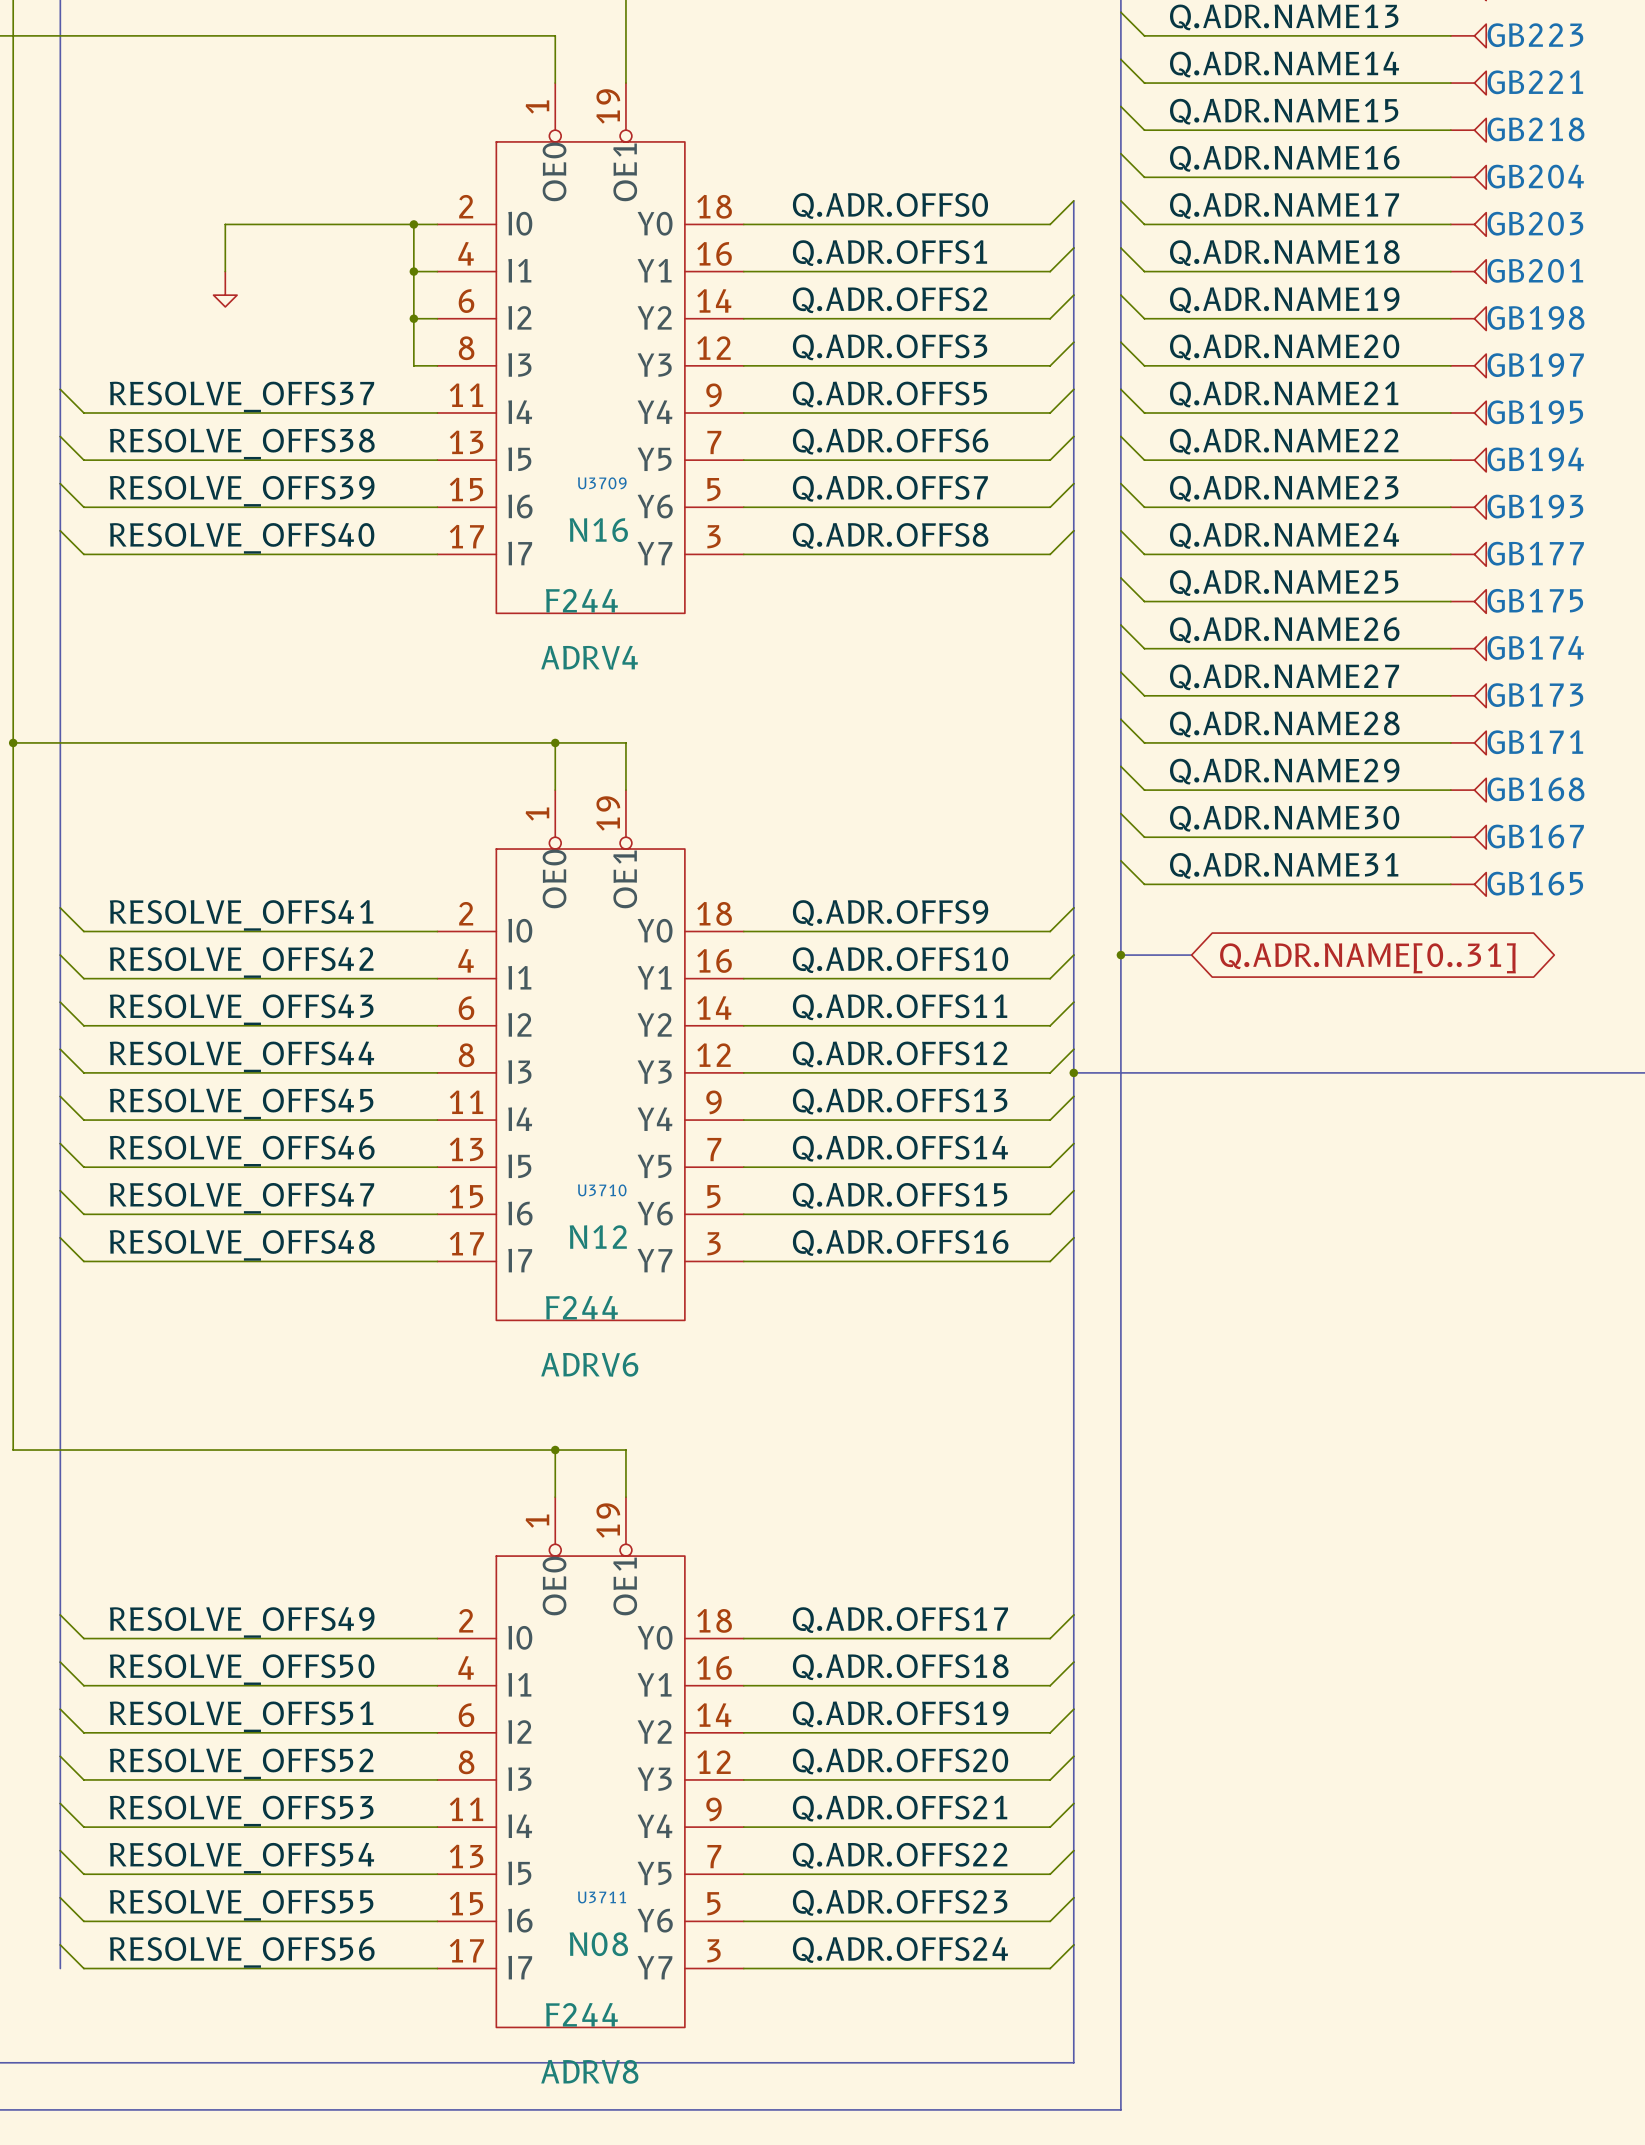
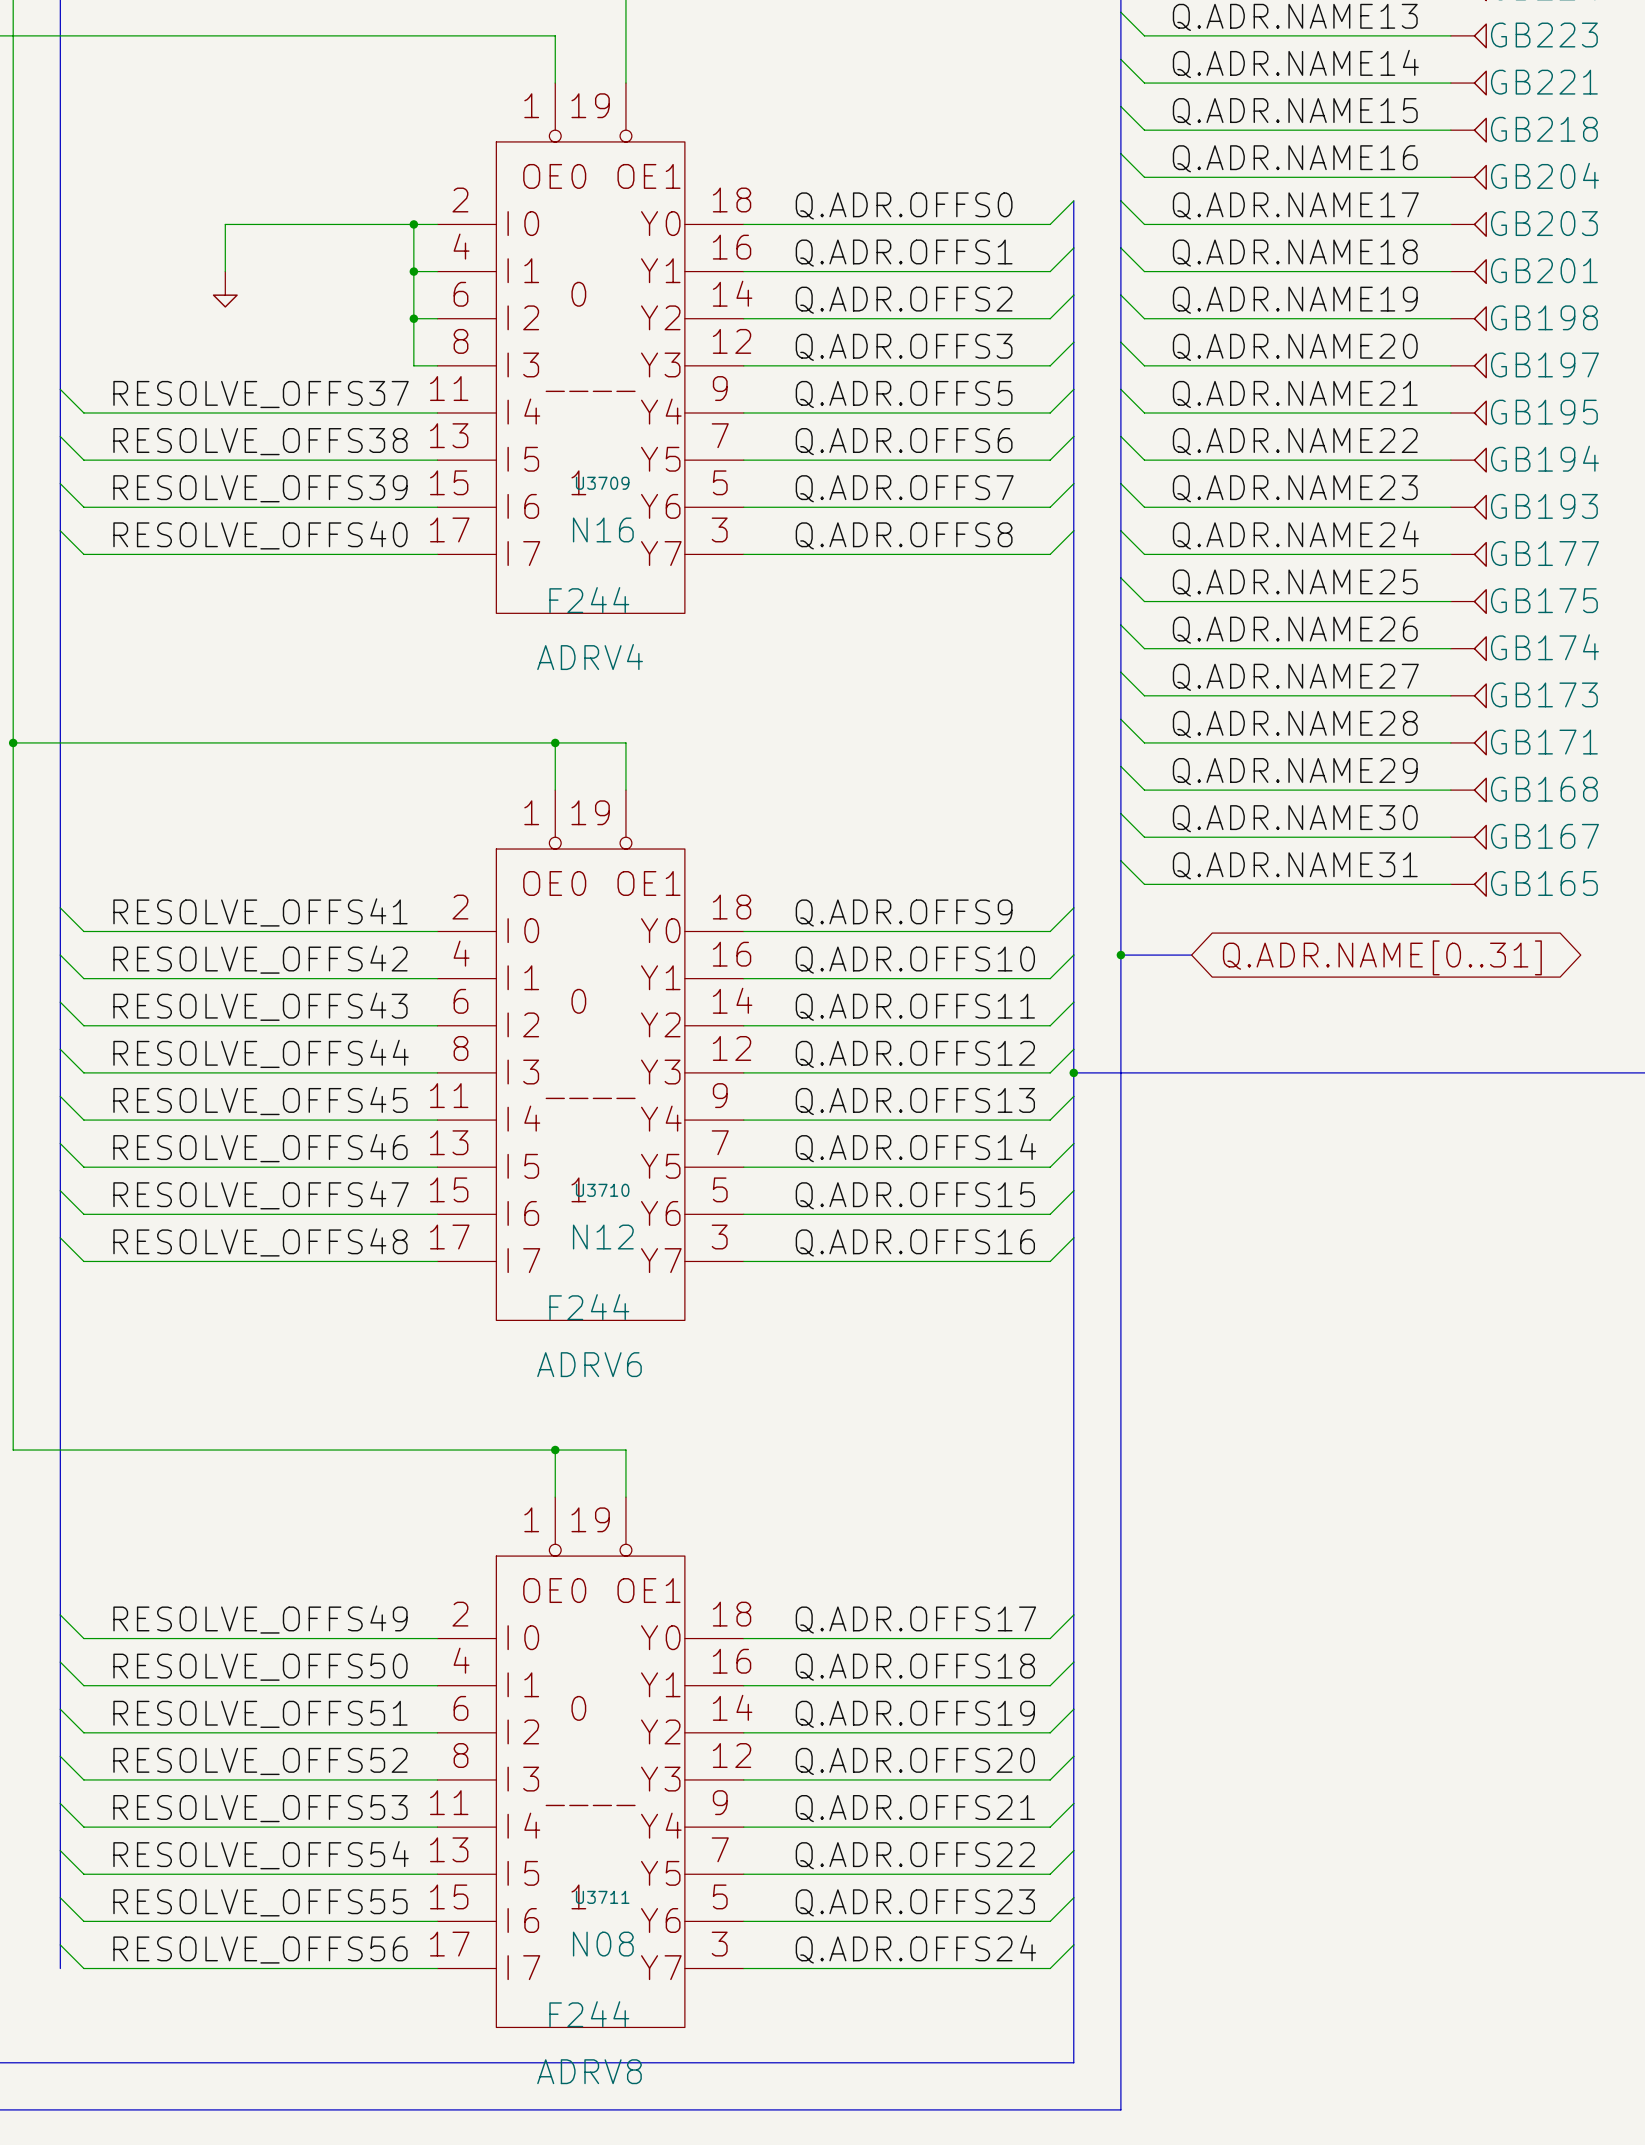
U3709 symbol: [437, 83, 744, 614] -> [437, 83, 744, 614]
U3710 symbol: [437, 790, 744, 1321] -> [437, 790, 744, 1321]
U3711 symbol: [437, 1497, 744, 2028] -> [437, 1497, 744, 2028]

